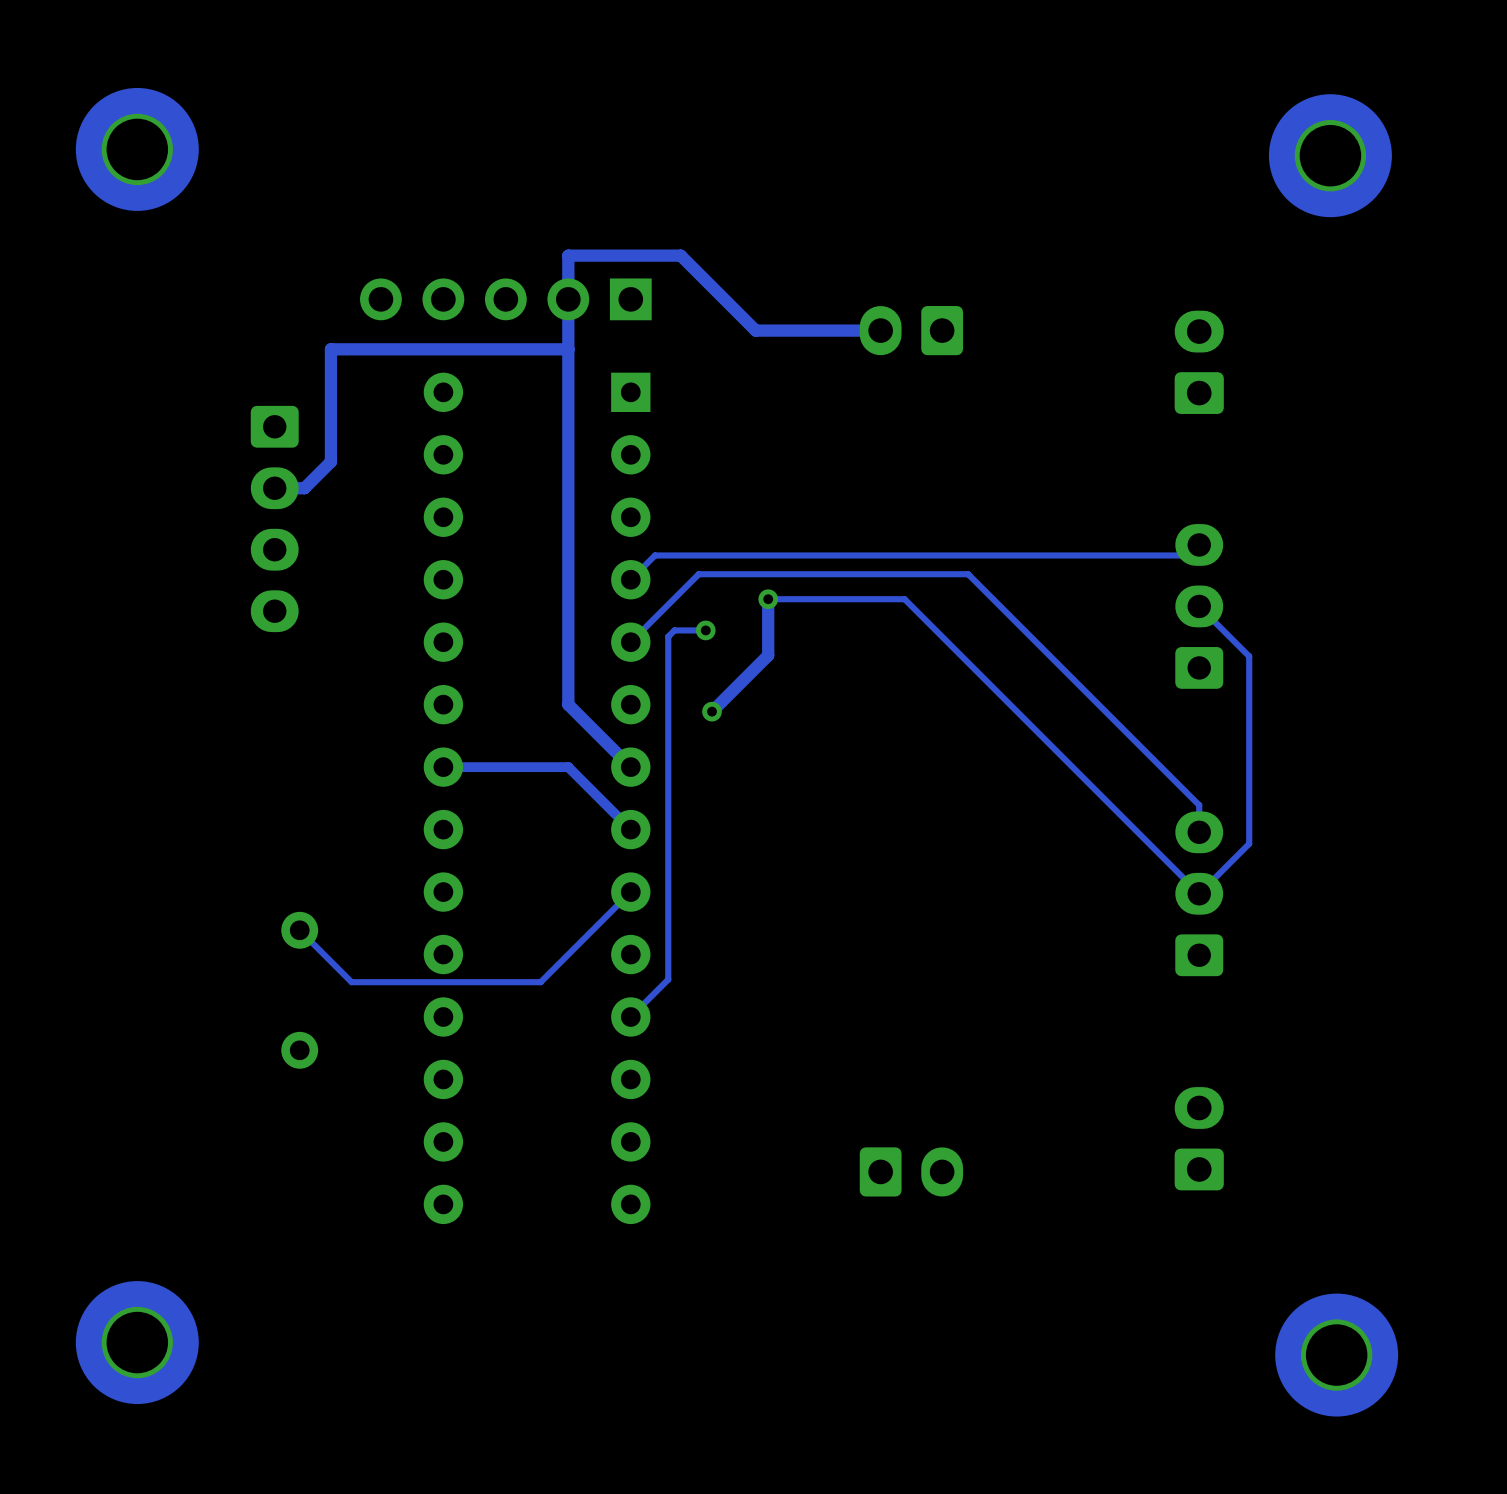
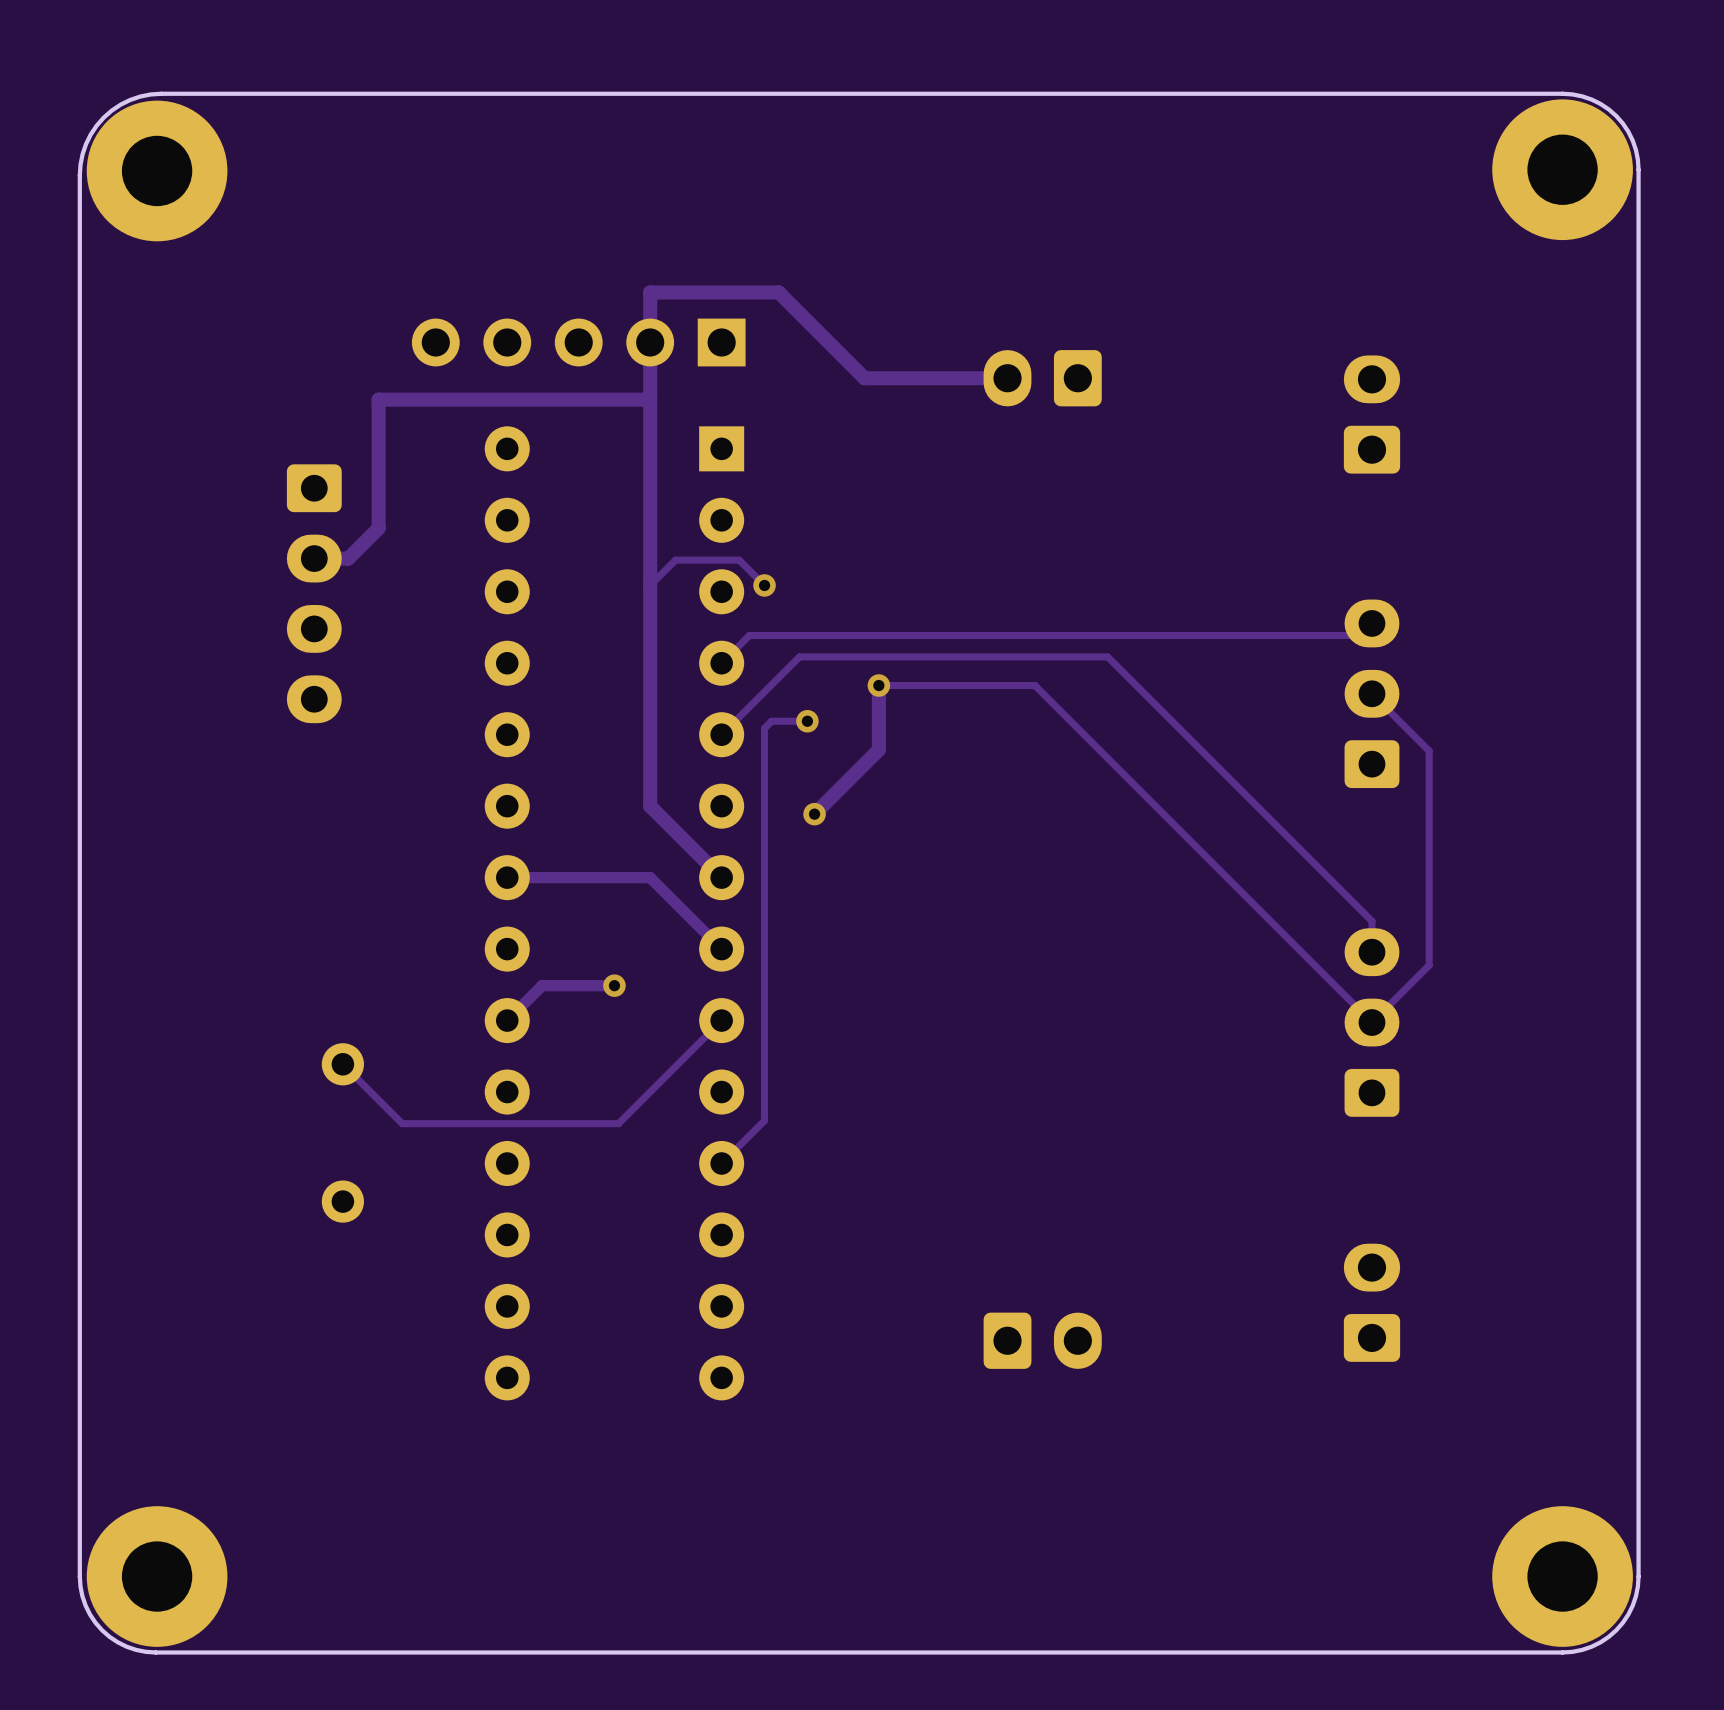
board edge: none -> (1562, 93) (161, 93) (130, 99) (103, 117) (86, 144) (79, 175) (79, 1576) (85, 1605) (102, 1630) (126, 1646) (155, 1652) (1562, 1652) (1591, 1646) (1616, 1630) (1632, 1605) (1638, 1576) (1638, 169) (1632, 140) (1616, 116) (1591, 99) (1562, 93)
part position: (1330, 155) -> (1562, 169)
track: none -> (764, 585) (739, 560) (675, 560) (650, 585)
via: none -> (764, 585)
track: none -> (614, 985) (542, 985) (507, 1020)
via: none -> (614, 985)
part position: (137, 1342) -> (157, 1576)
part position: (1336, 1355) -> (1562, 1576)

